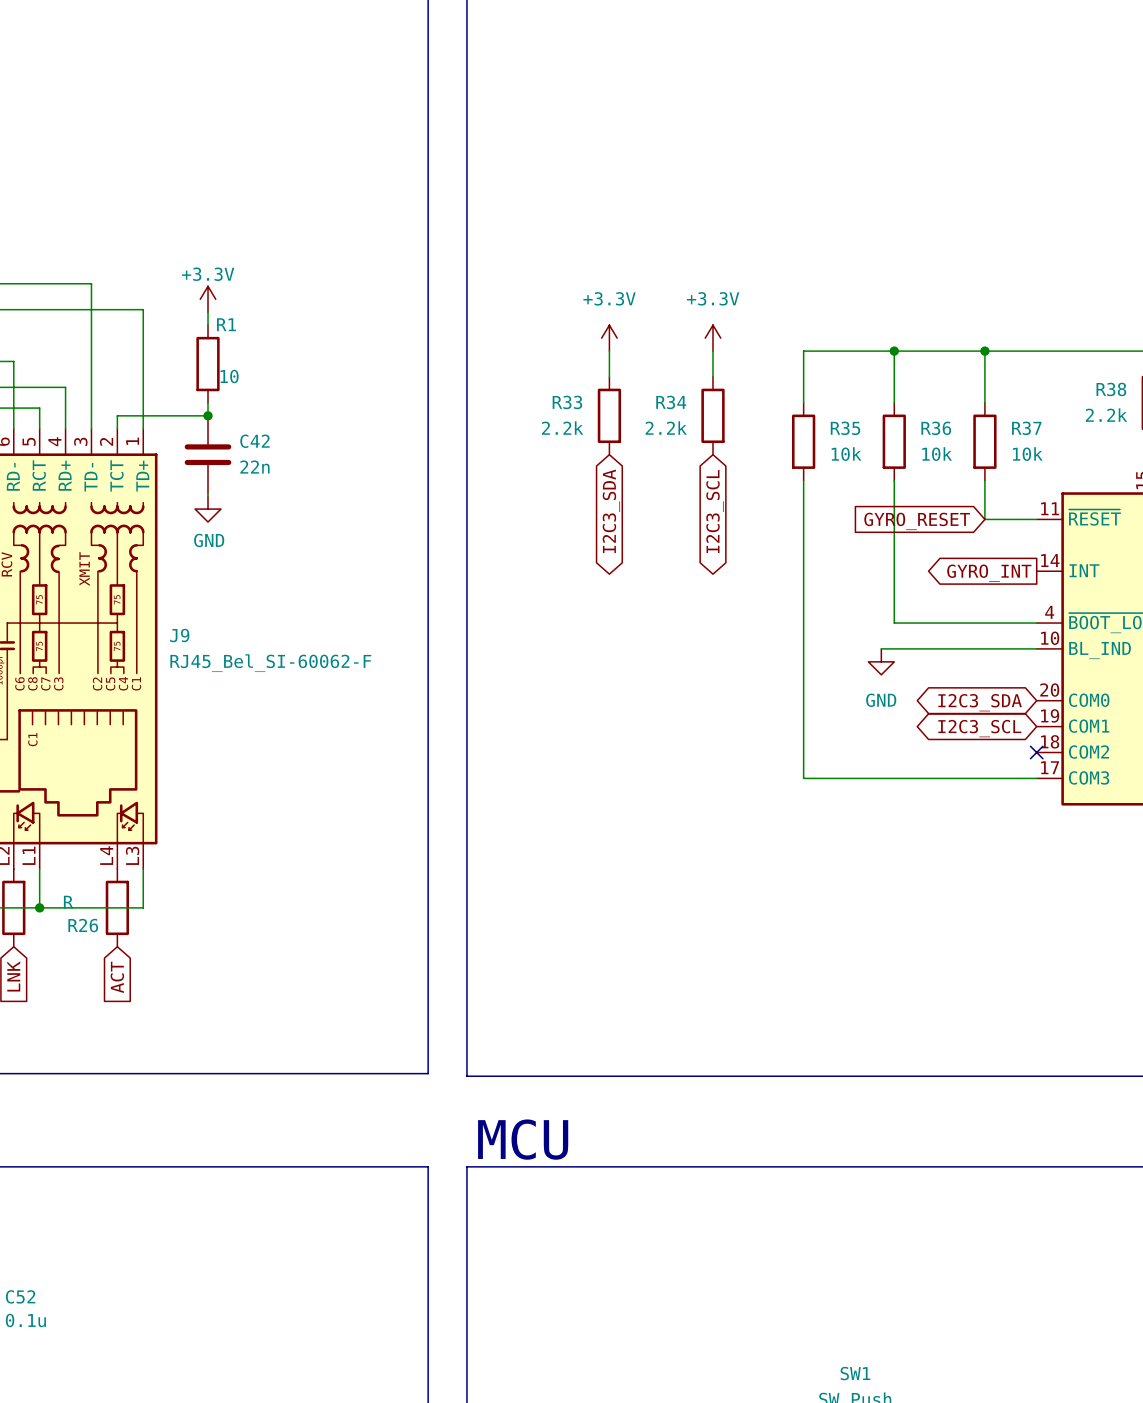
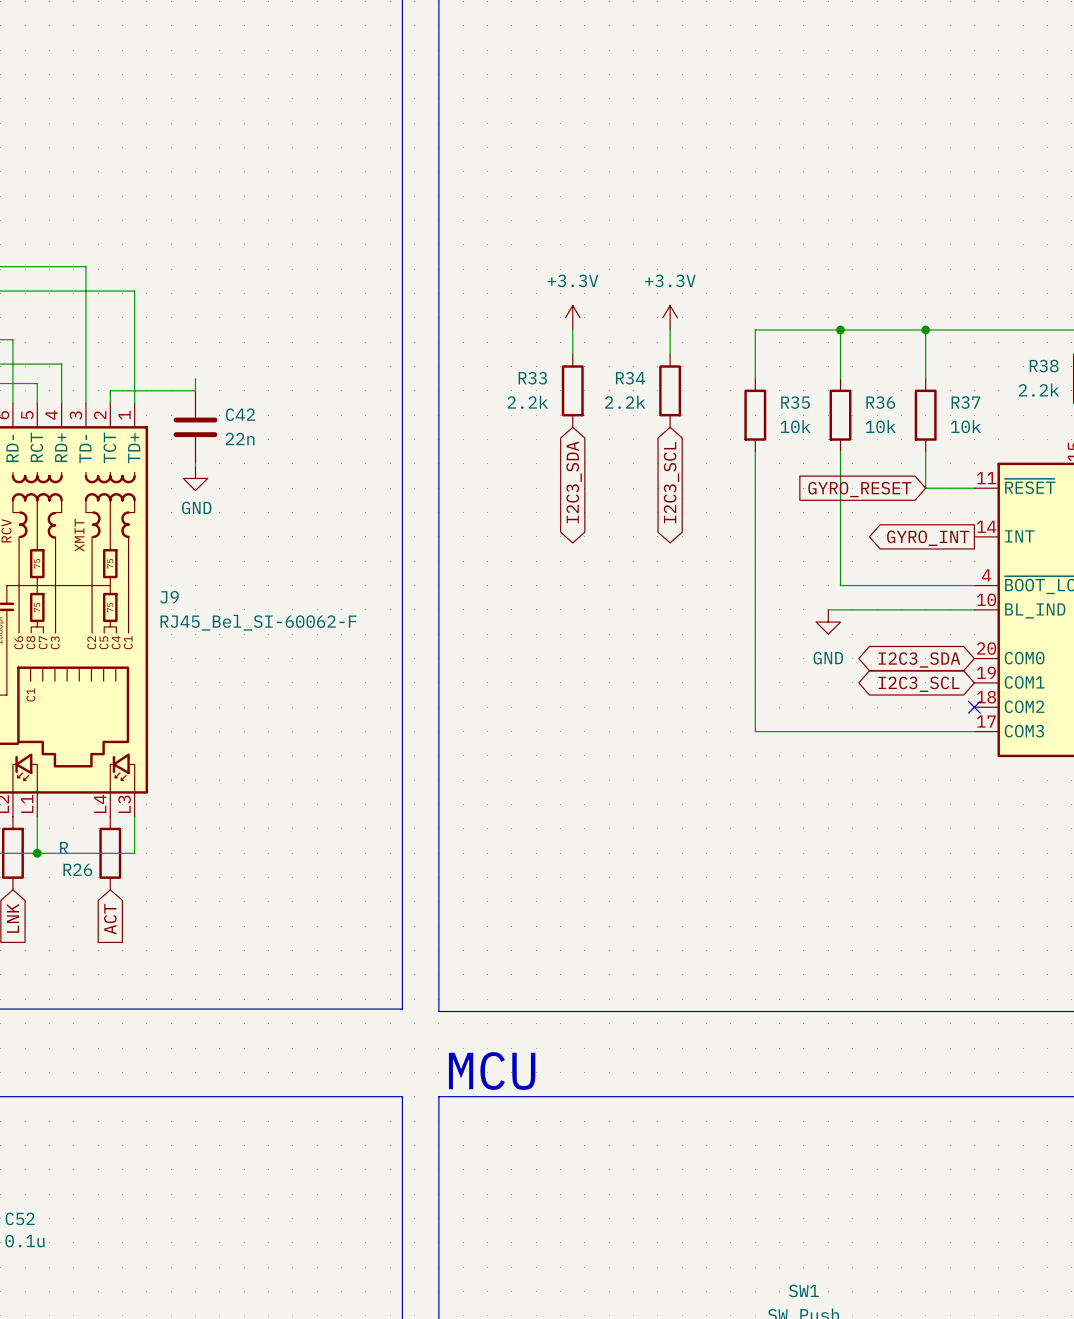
power symbol: +3.3V (208, 299) -> none
wire: (208, 312) (208, 325) -> none
R1: 10 (208, 364) -> none
junction: (208, 415) -> none

